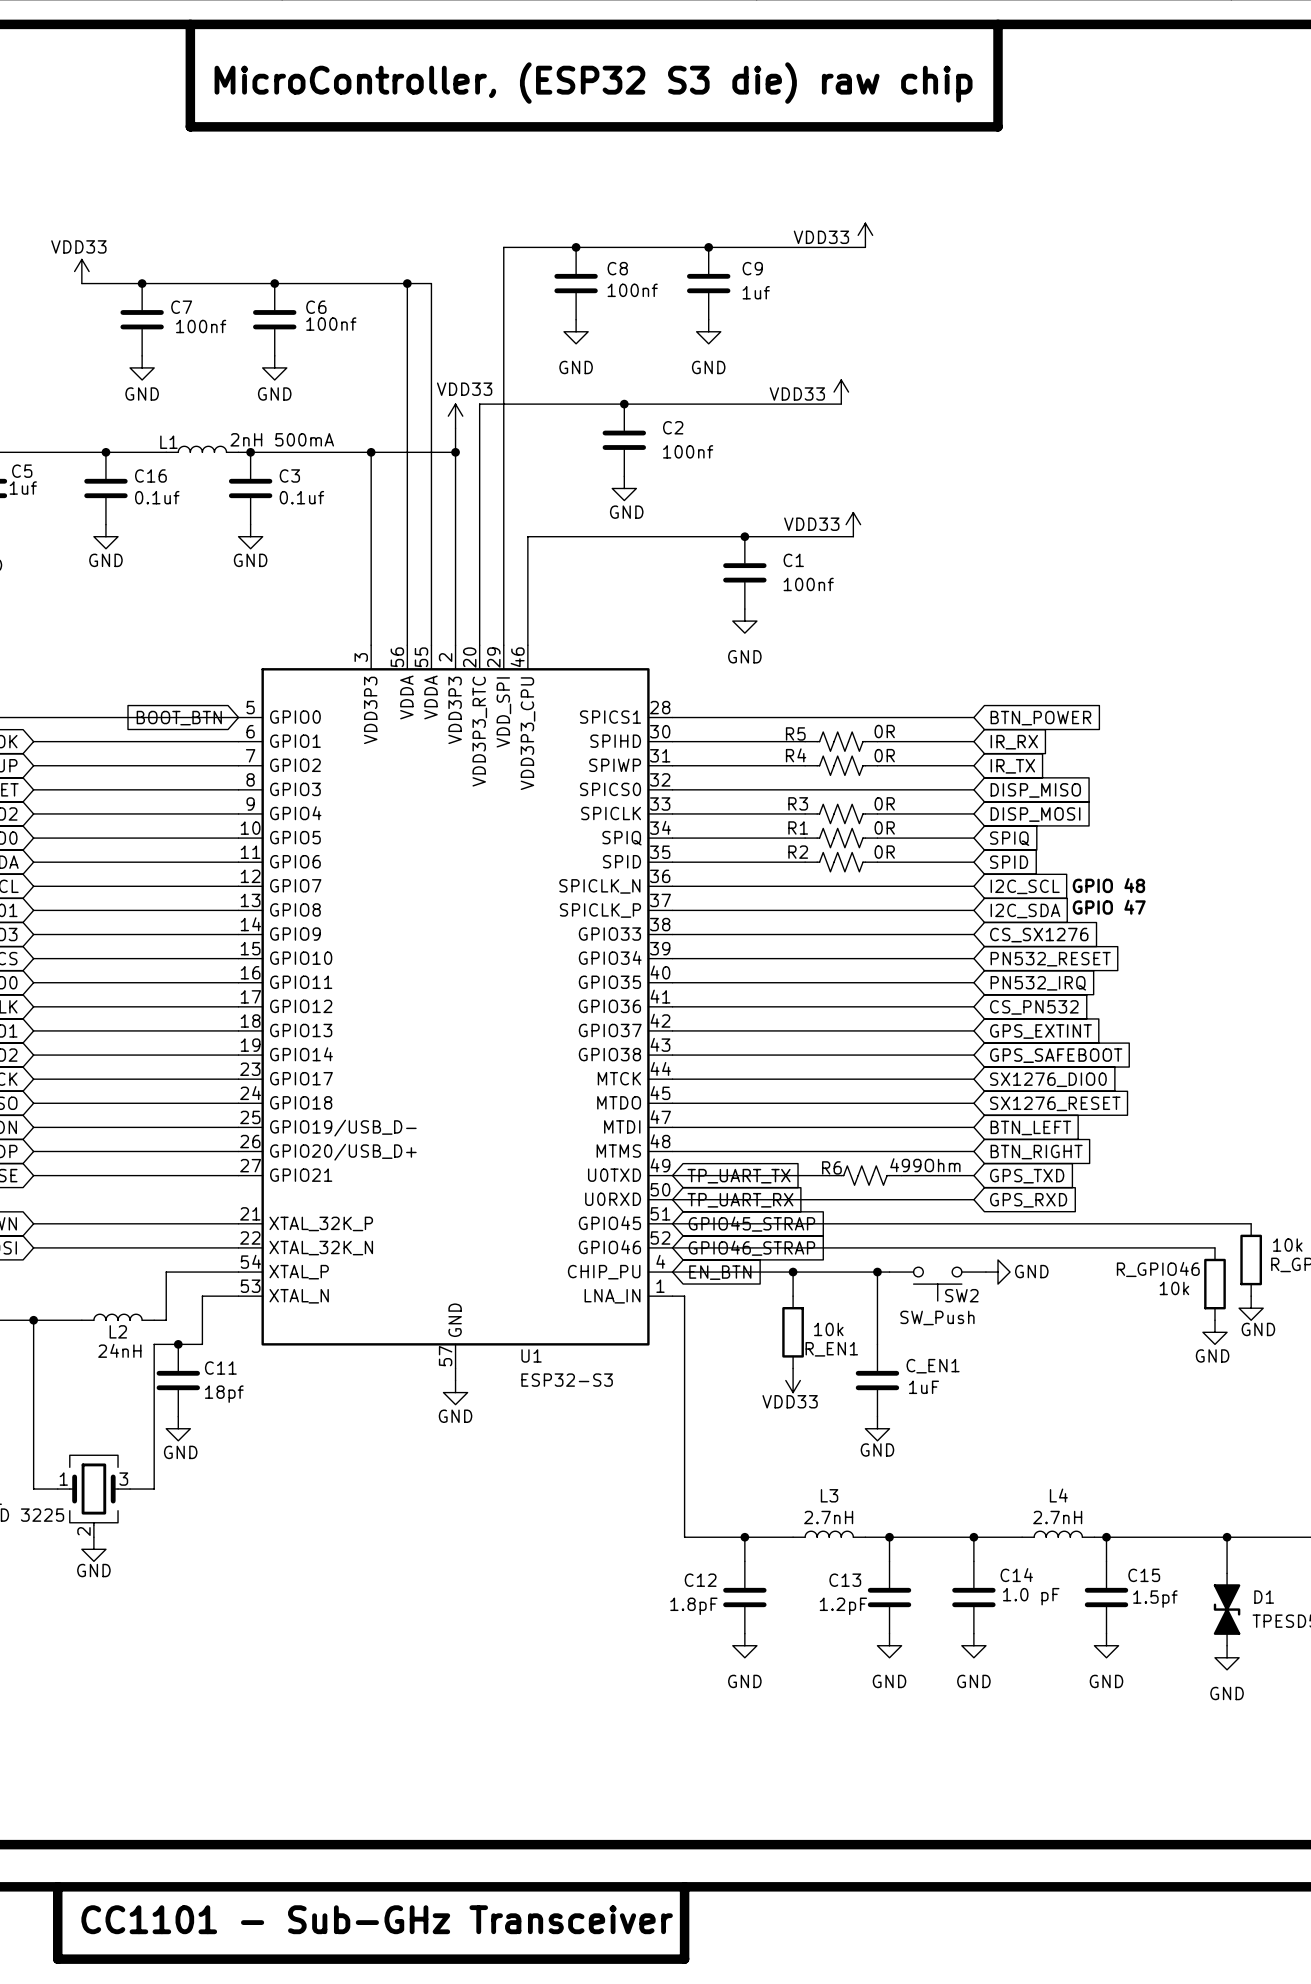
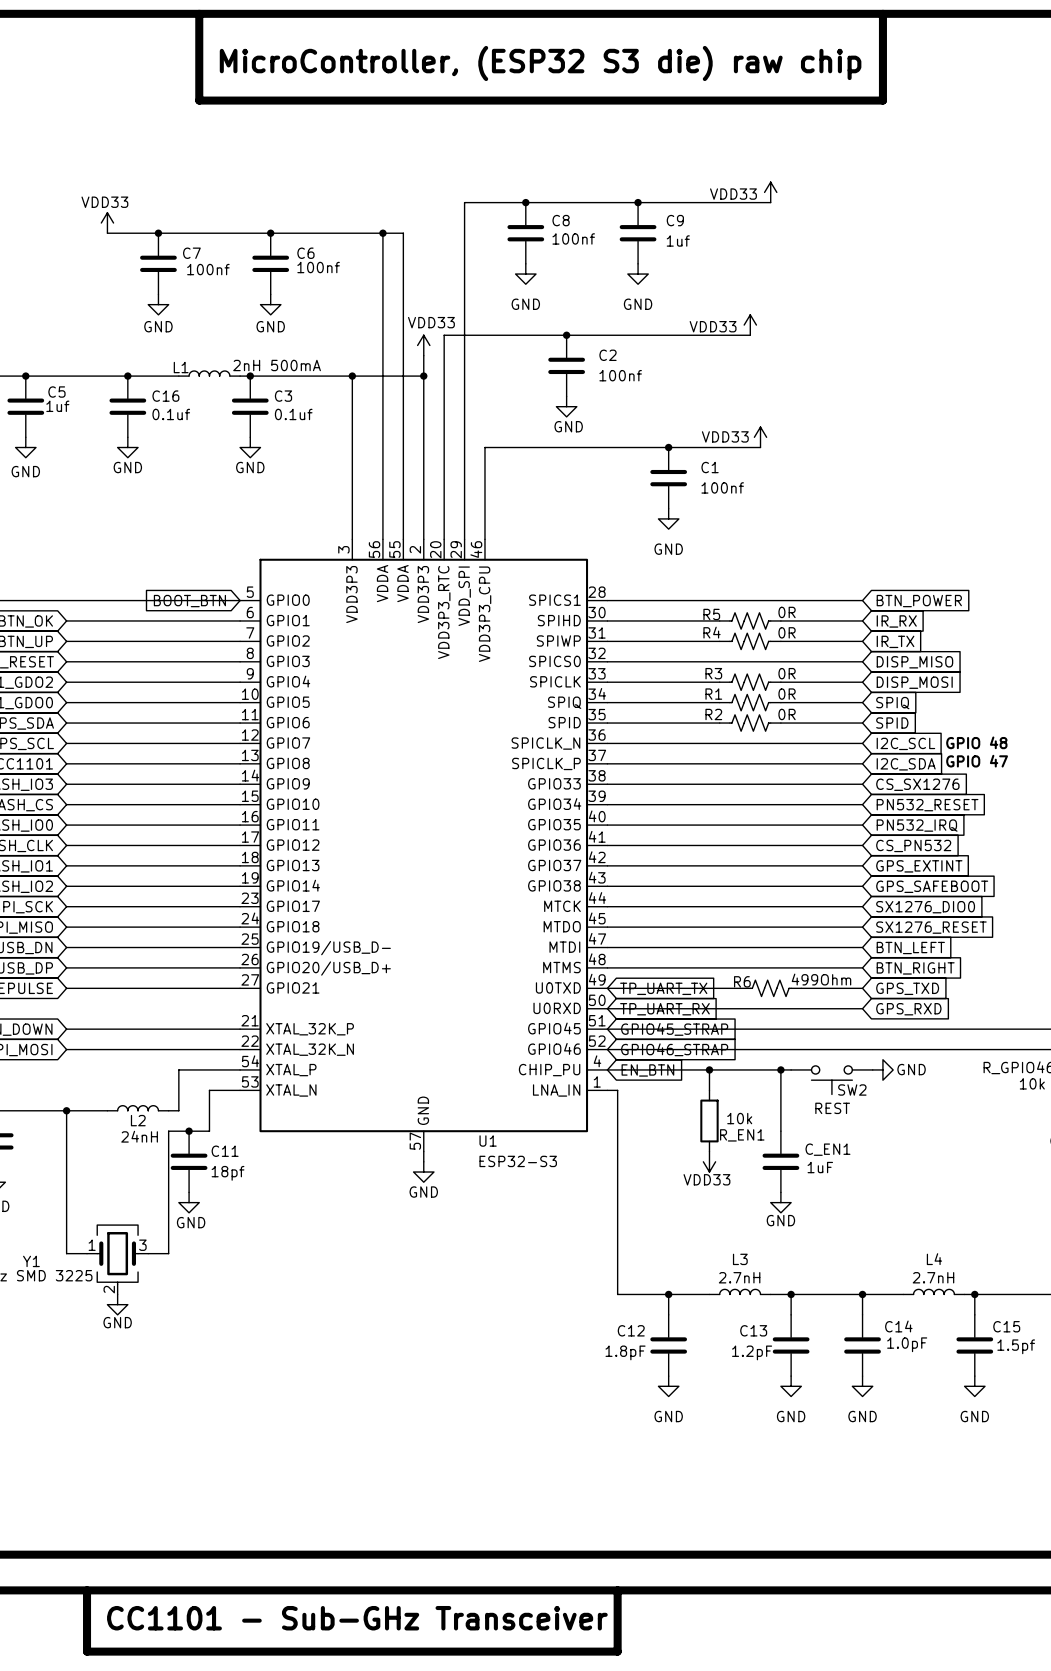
SW2 value: SW_Push (937, 1317) -> REST (832, 1108)
C14 value: 1.0 pF (1031, 1596) -> 1.0pF (907, 1344)

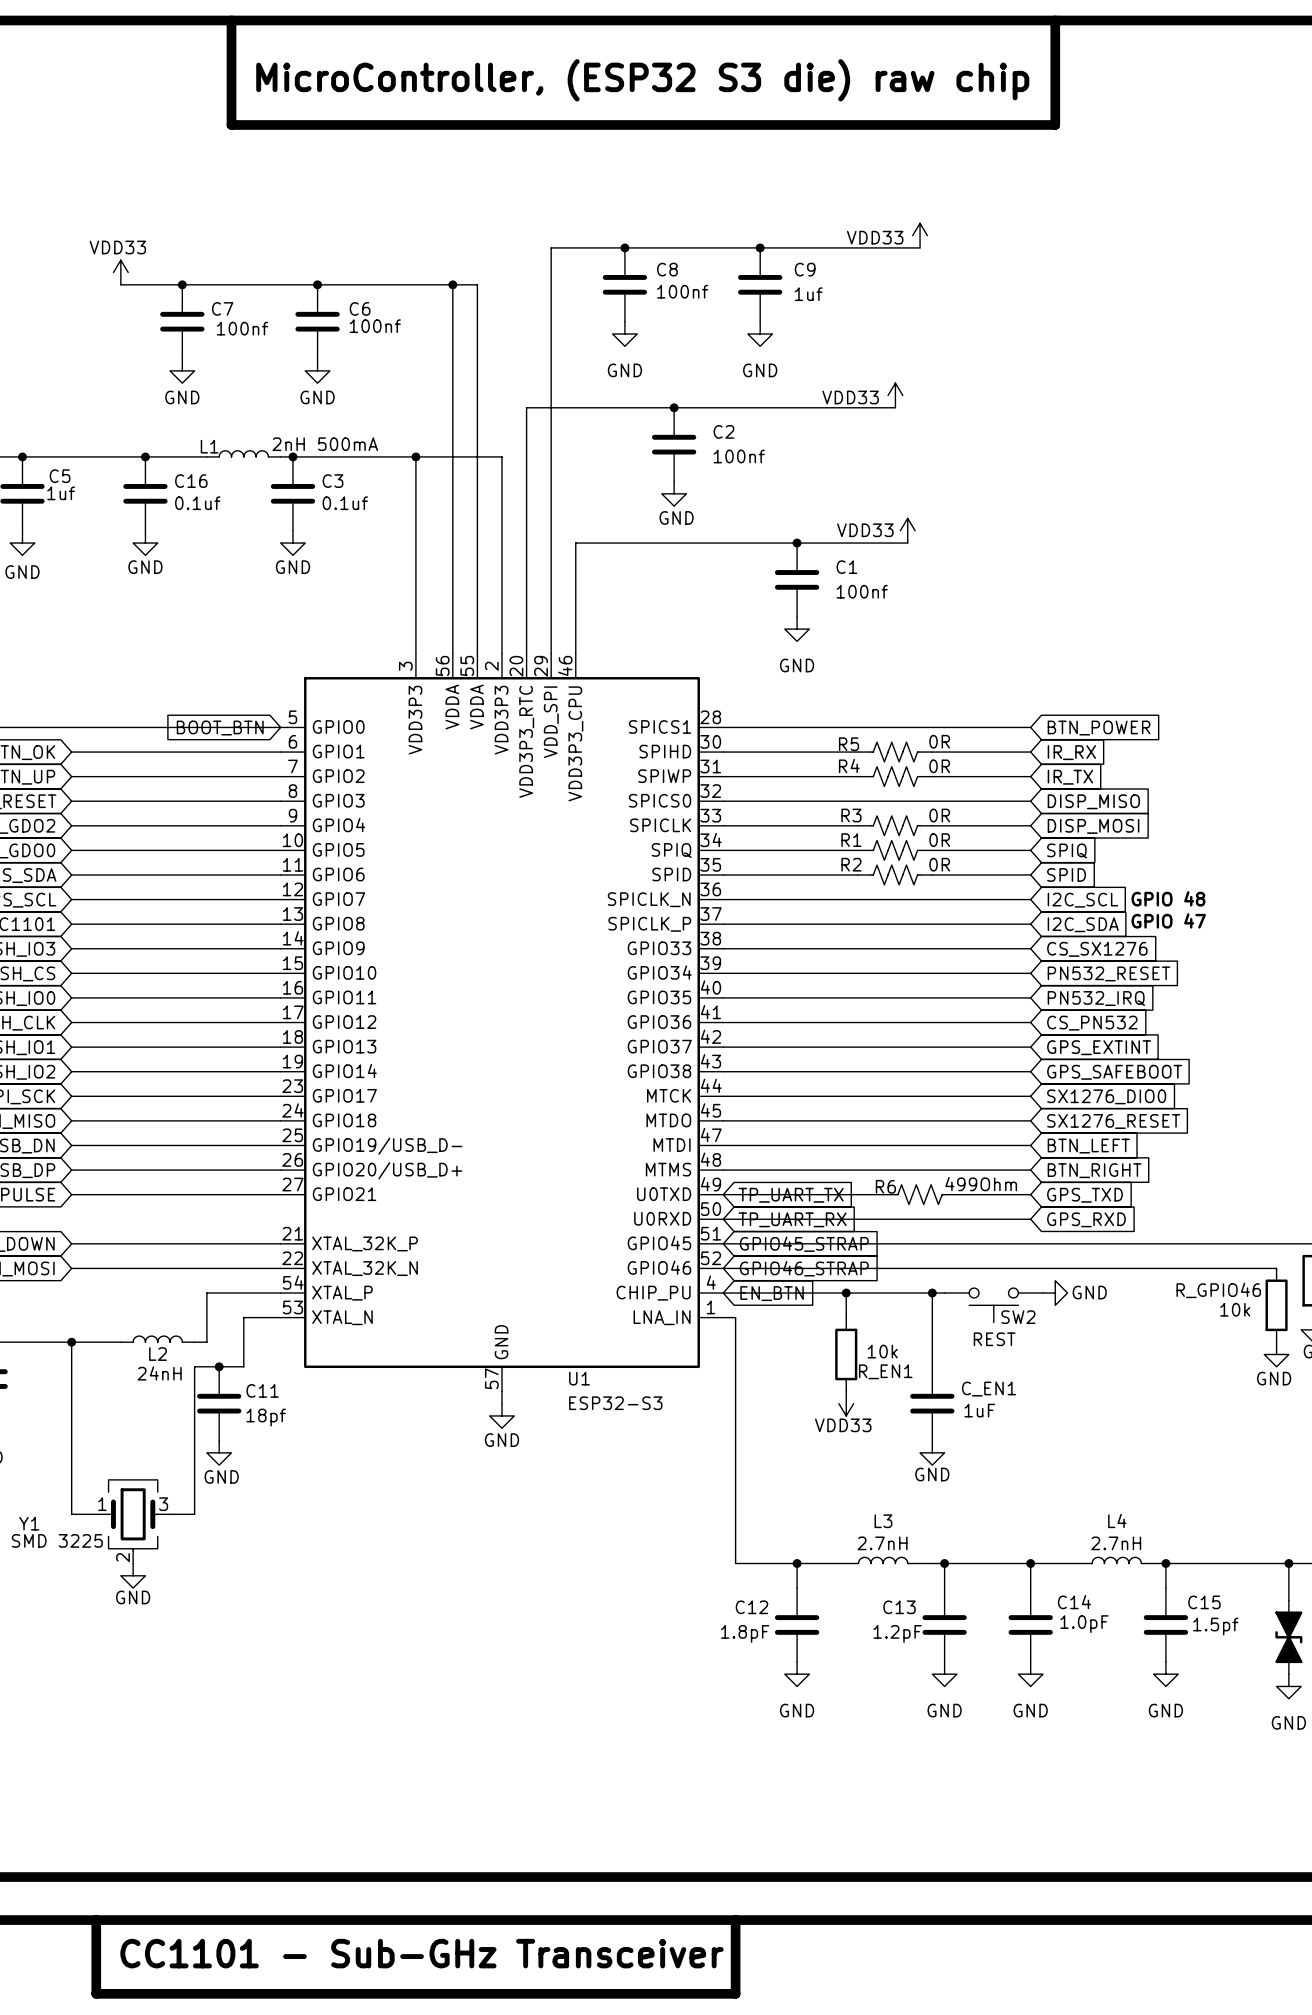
power symbol: VDD33 (423, 345) -> none
wire: (423, 355) (423, 376) -> none
junction: (423, 376) -> none

